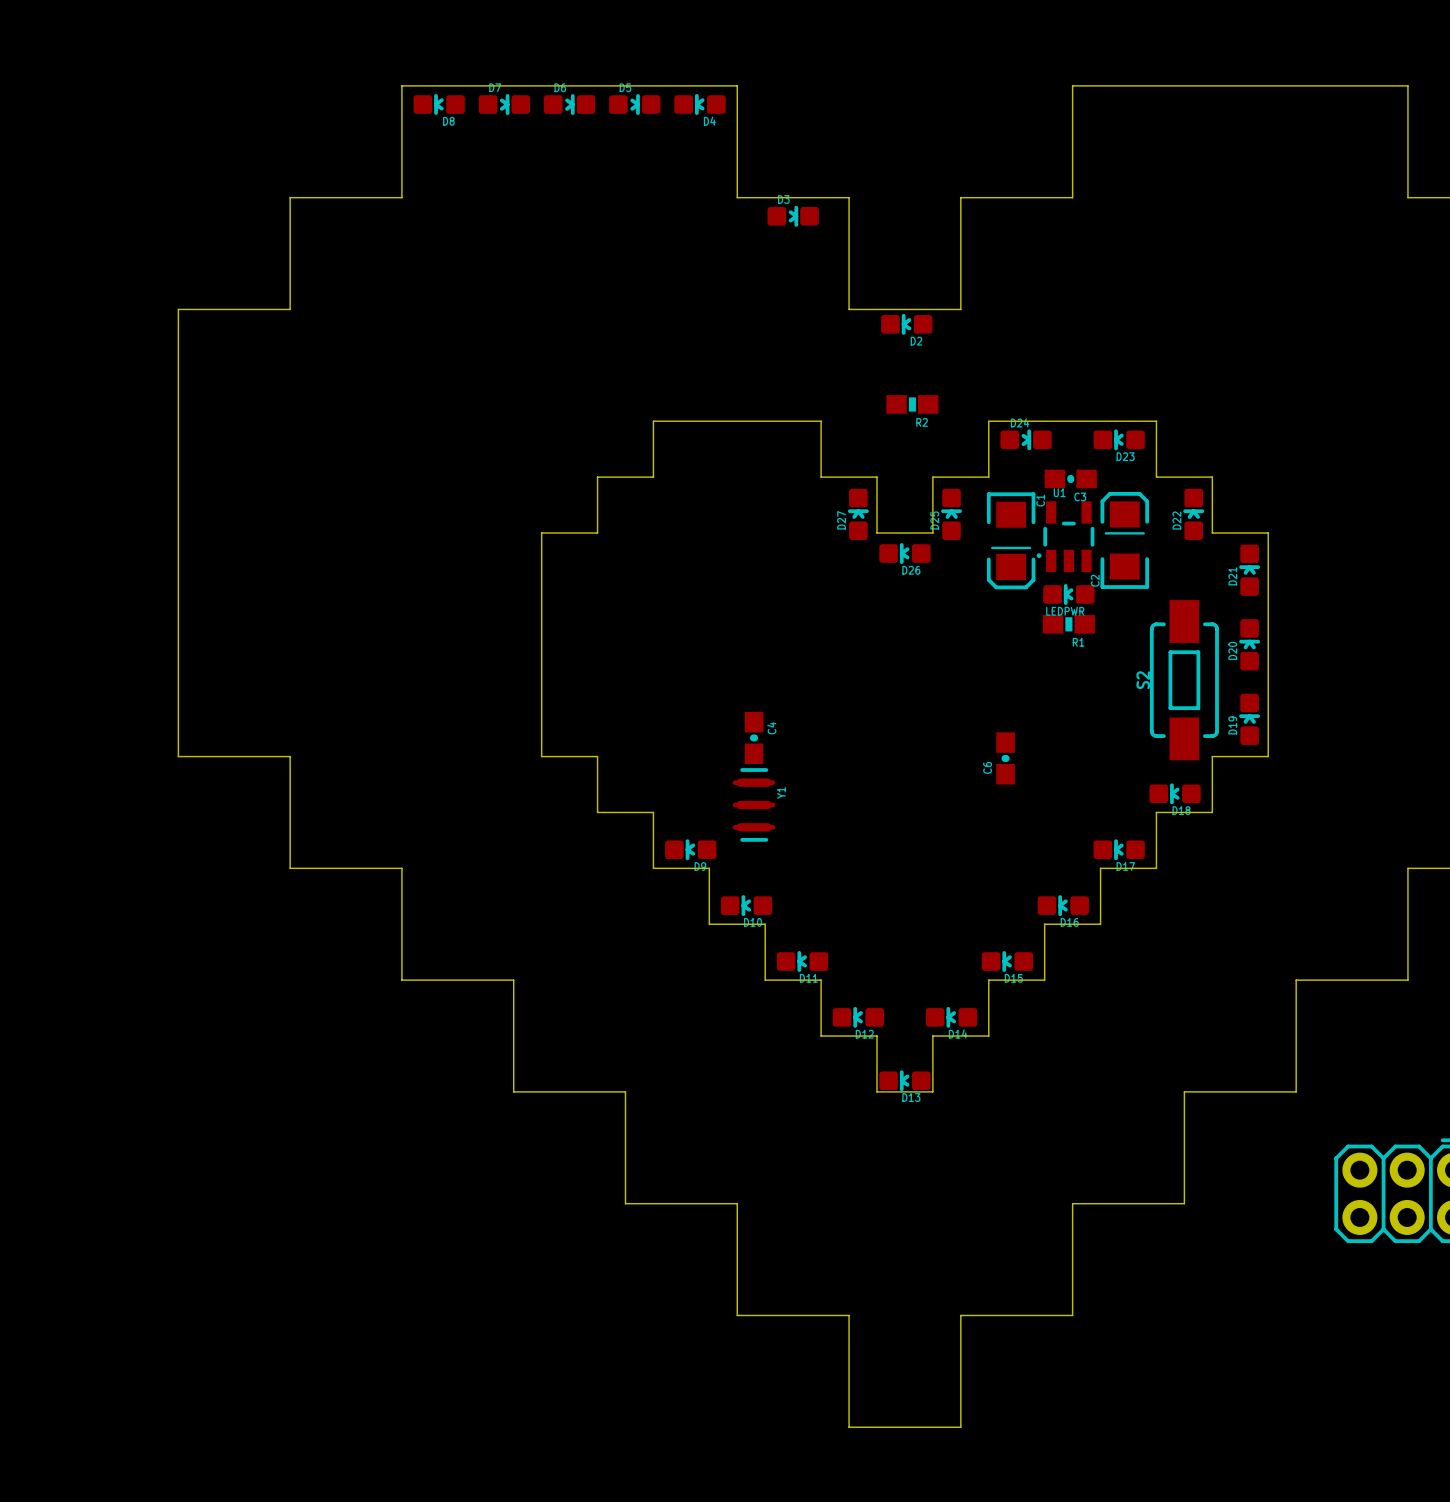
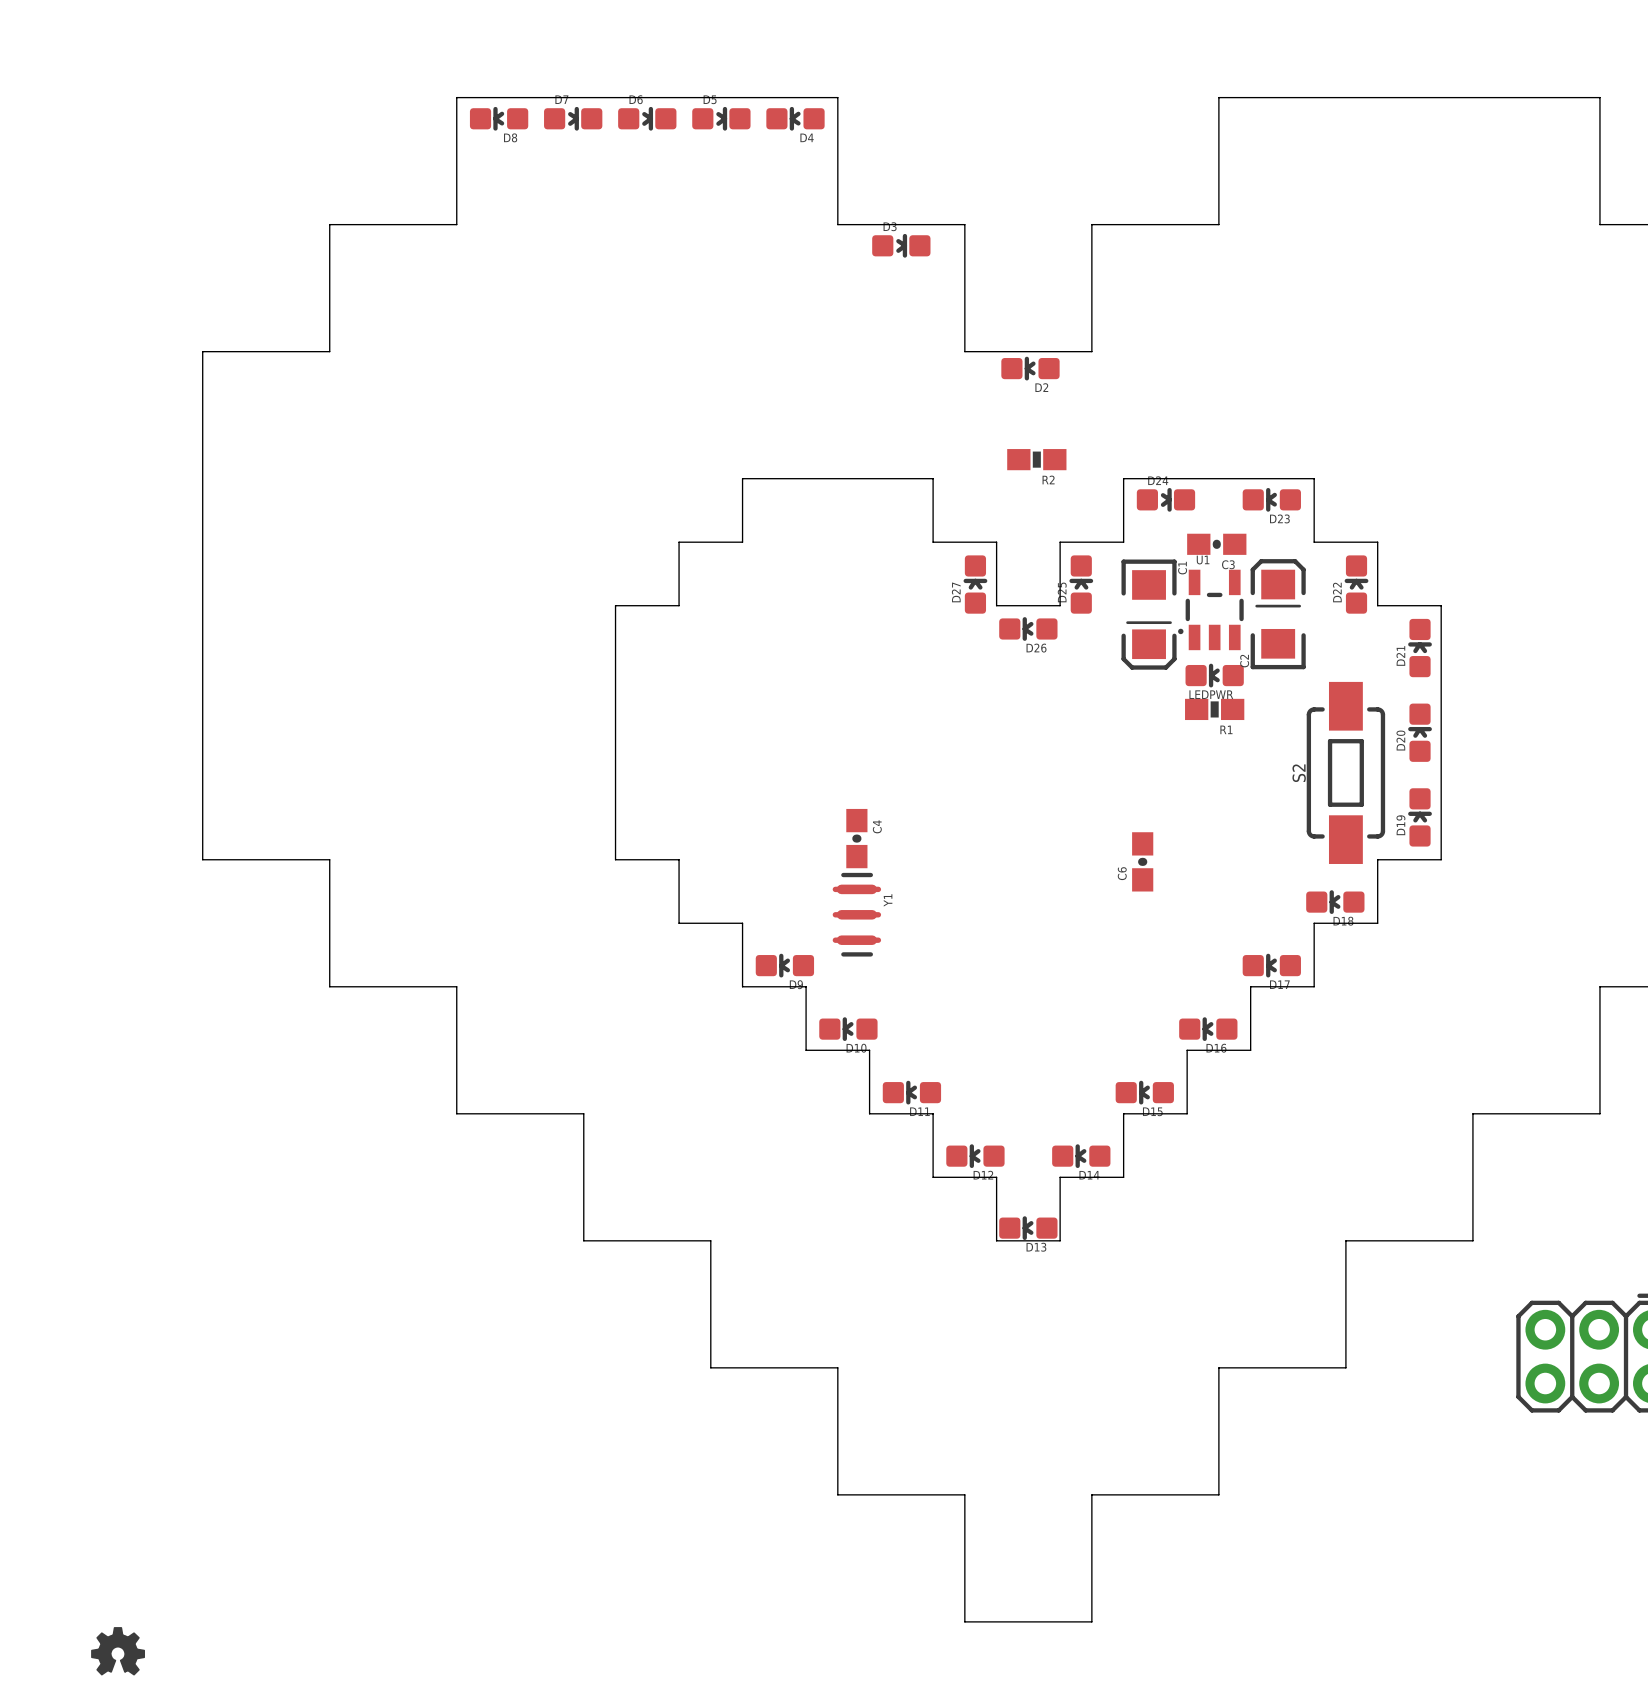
drawing: none -> [91, 1627, 146, 1676]

